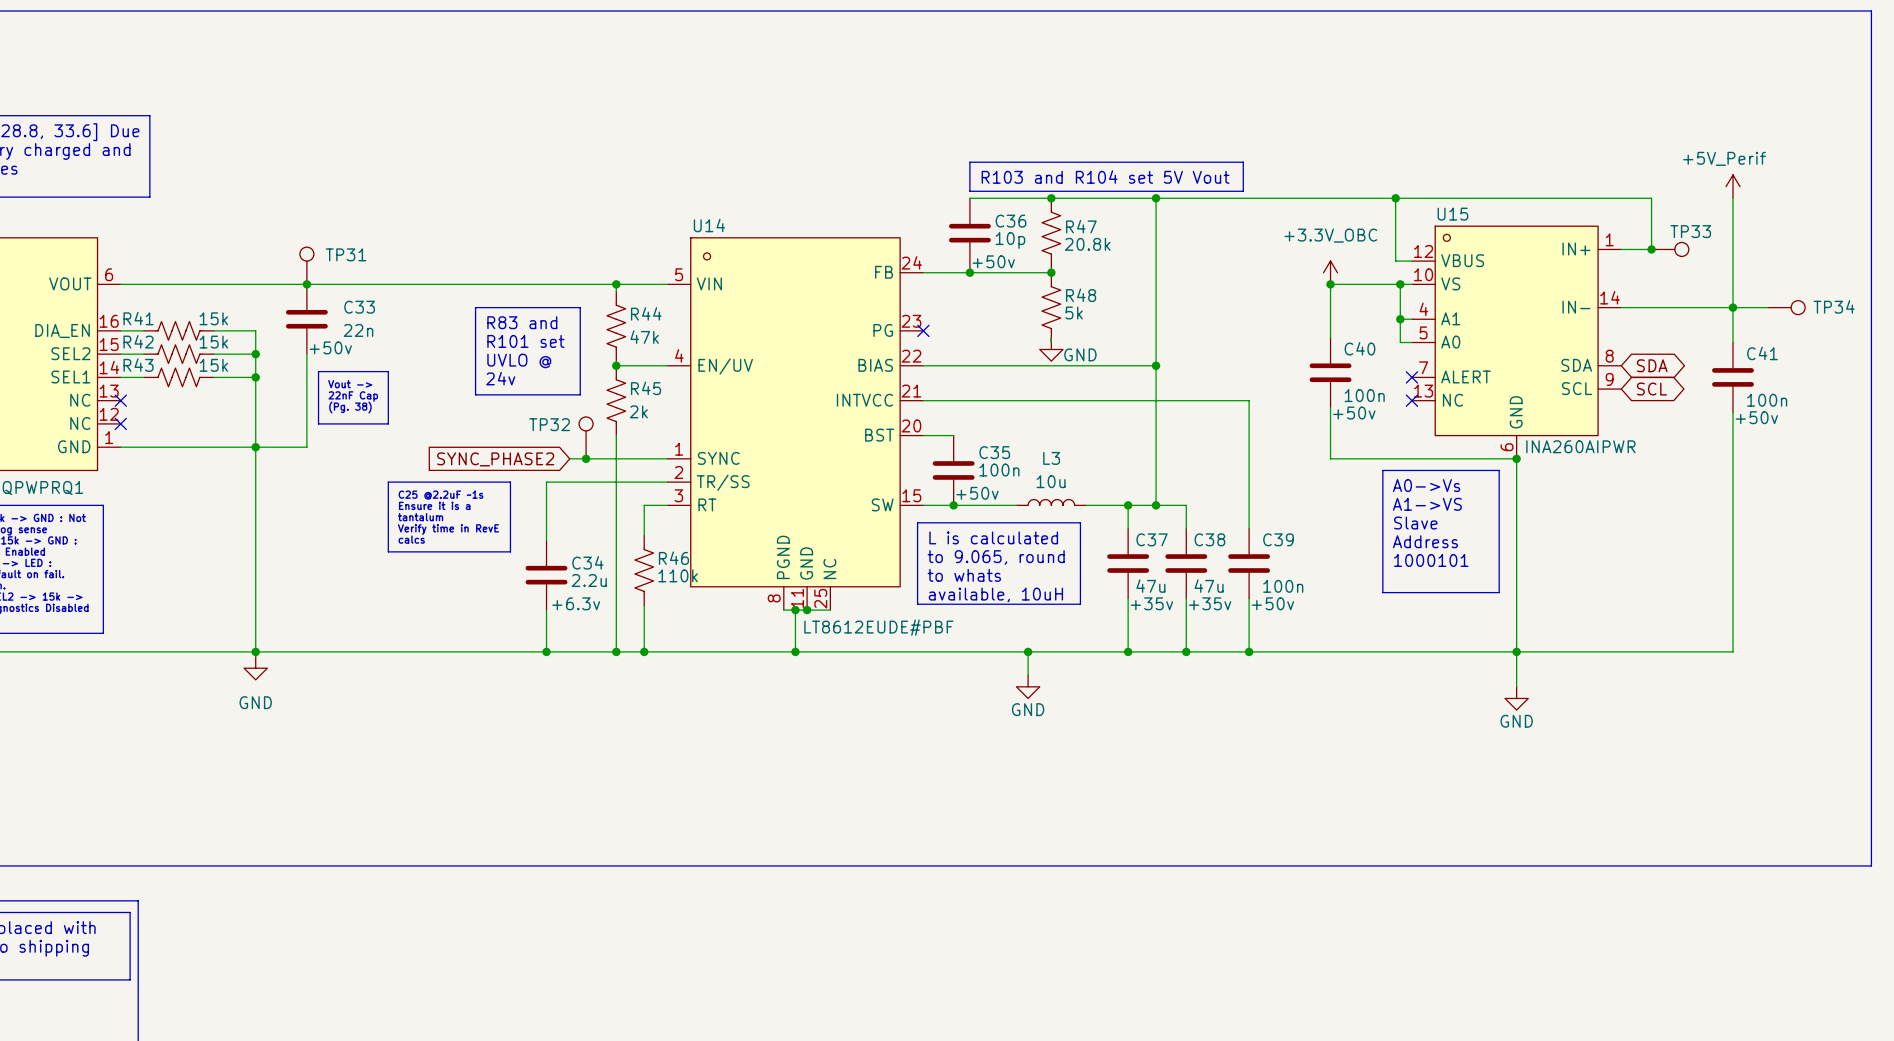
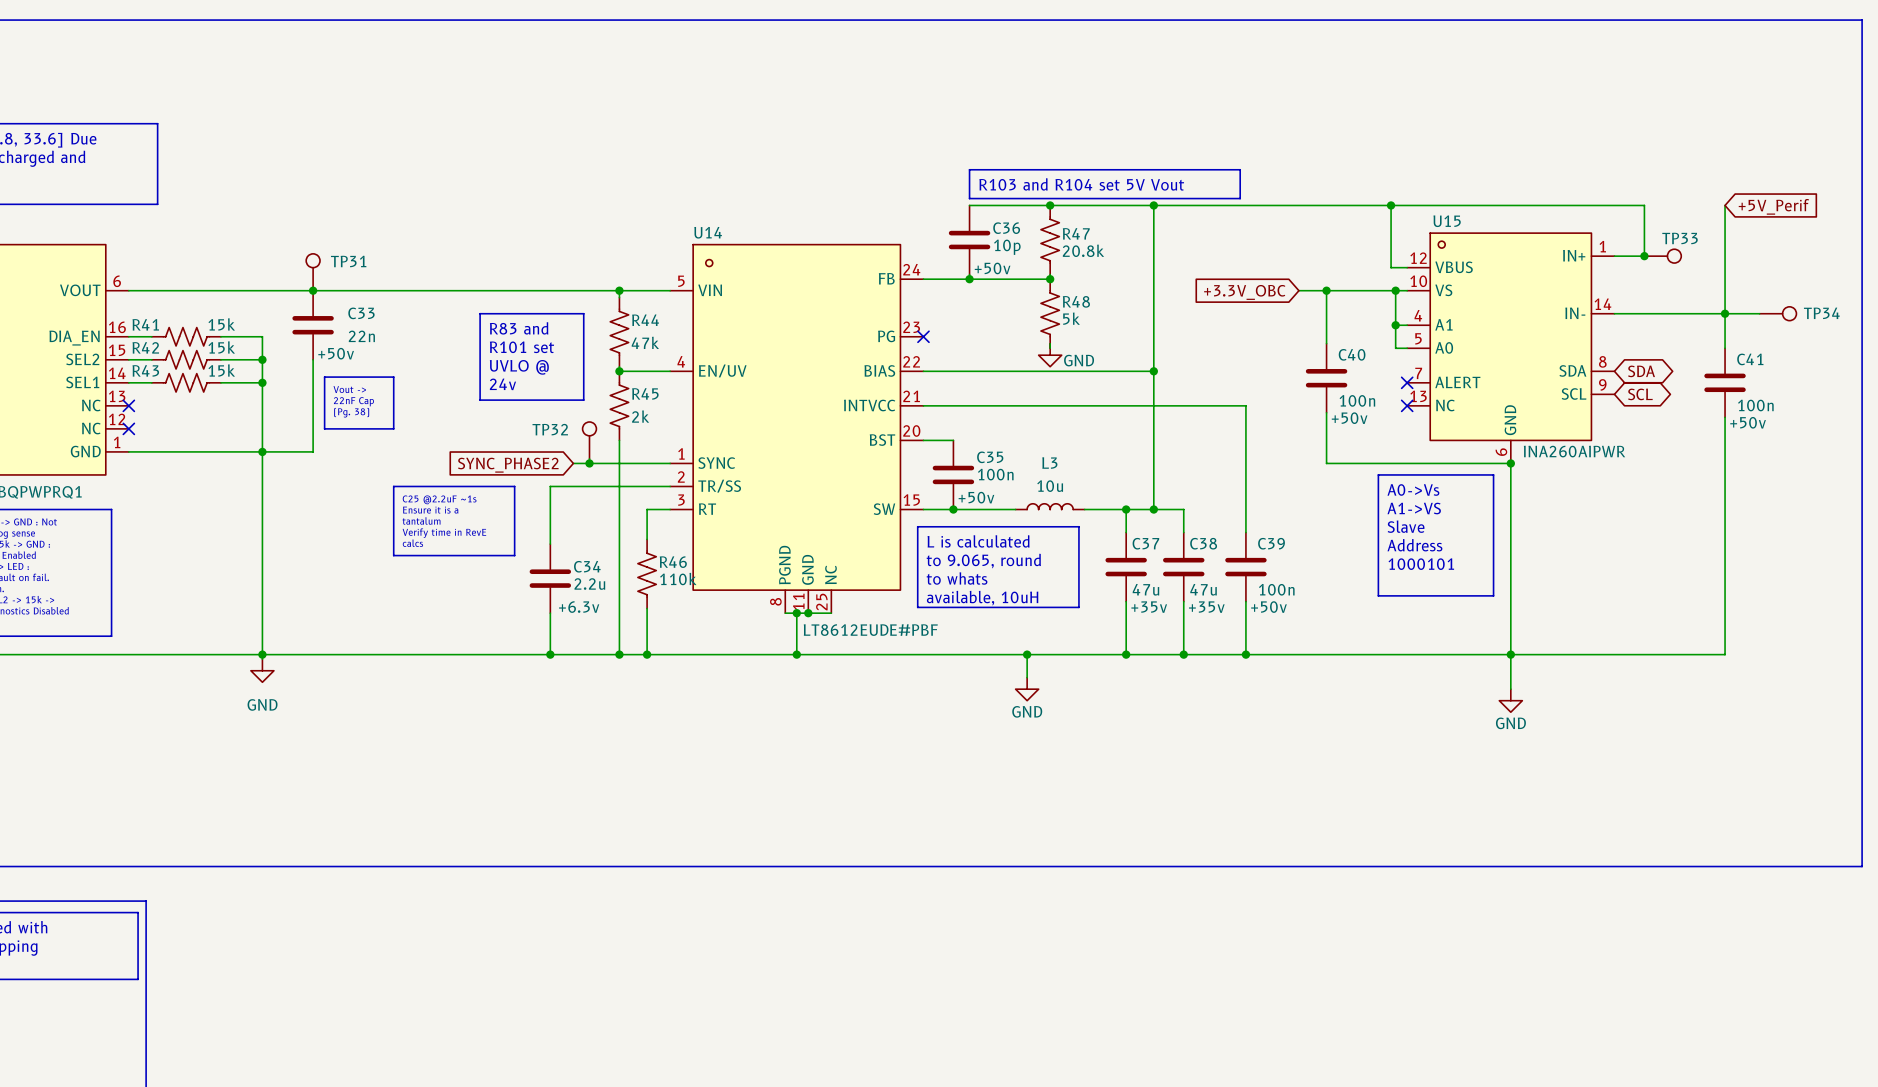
power symbol: +5V_Perif (1733, 186) -> none
global label: none -> +5V_Perif (1773, 206)
power symbol: +3.3V_OBC (1330, 272) -> none
global label: none -> +3.3V_OBC (1244, 292)
wire: none -> (1298, 290) (1326, 290)

